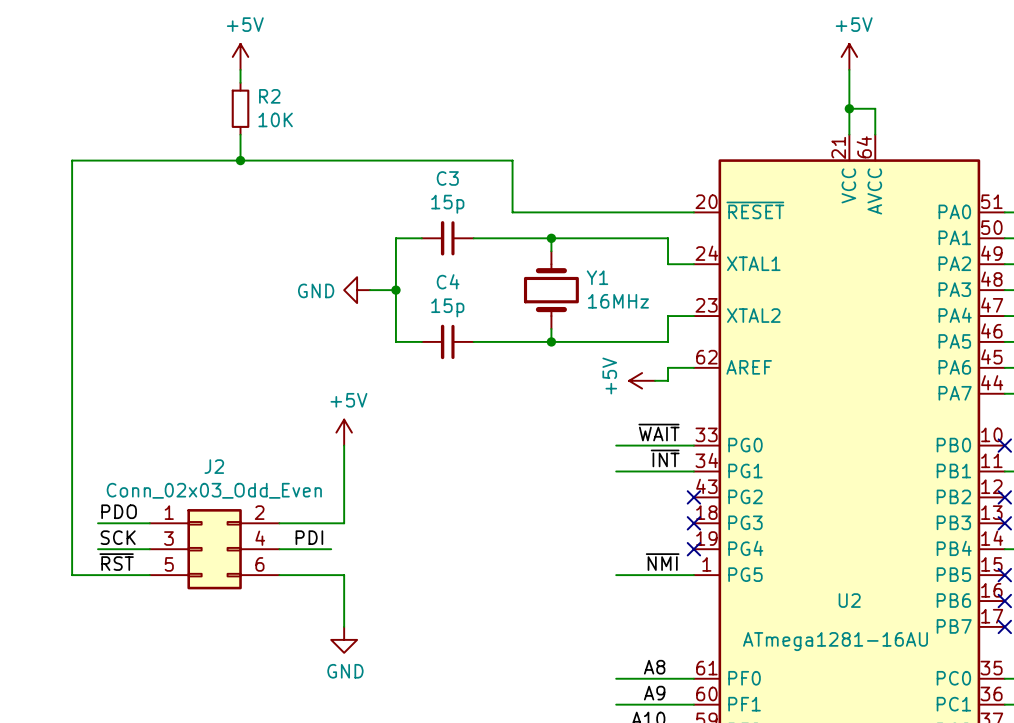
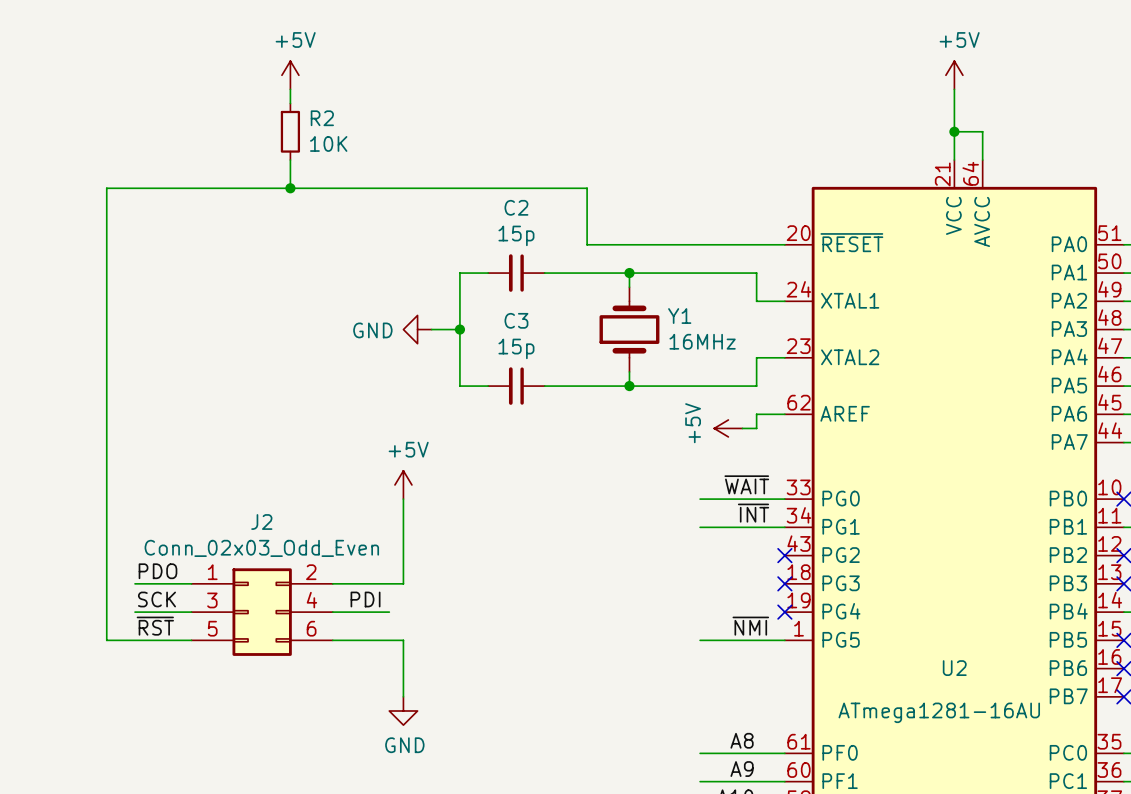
C3 name: C3 (447, 178) -> C2 (516, 207)
C4 name: C4 (448, 281) -> C3 (516, 320)

